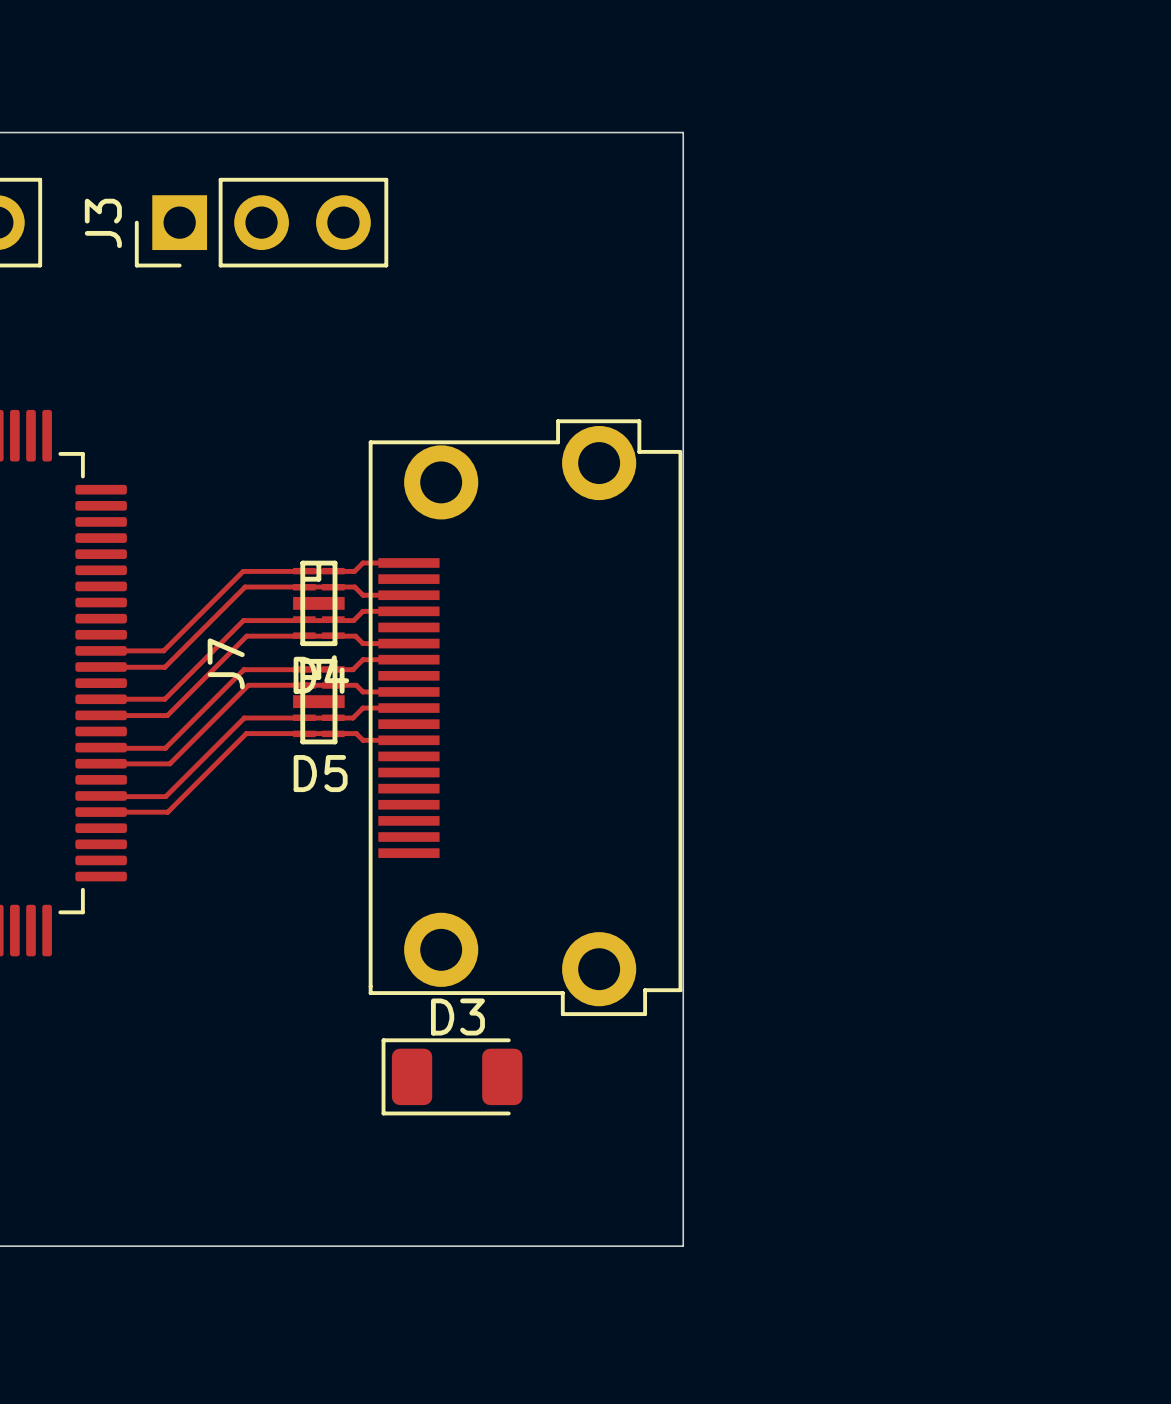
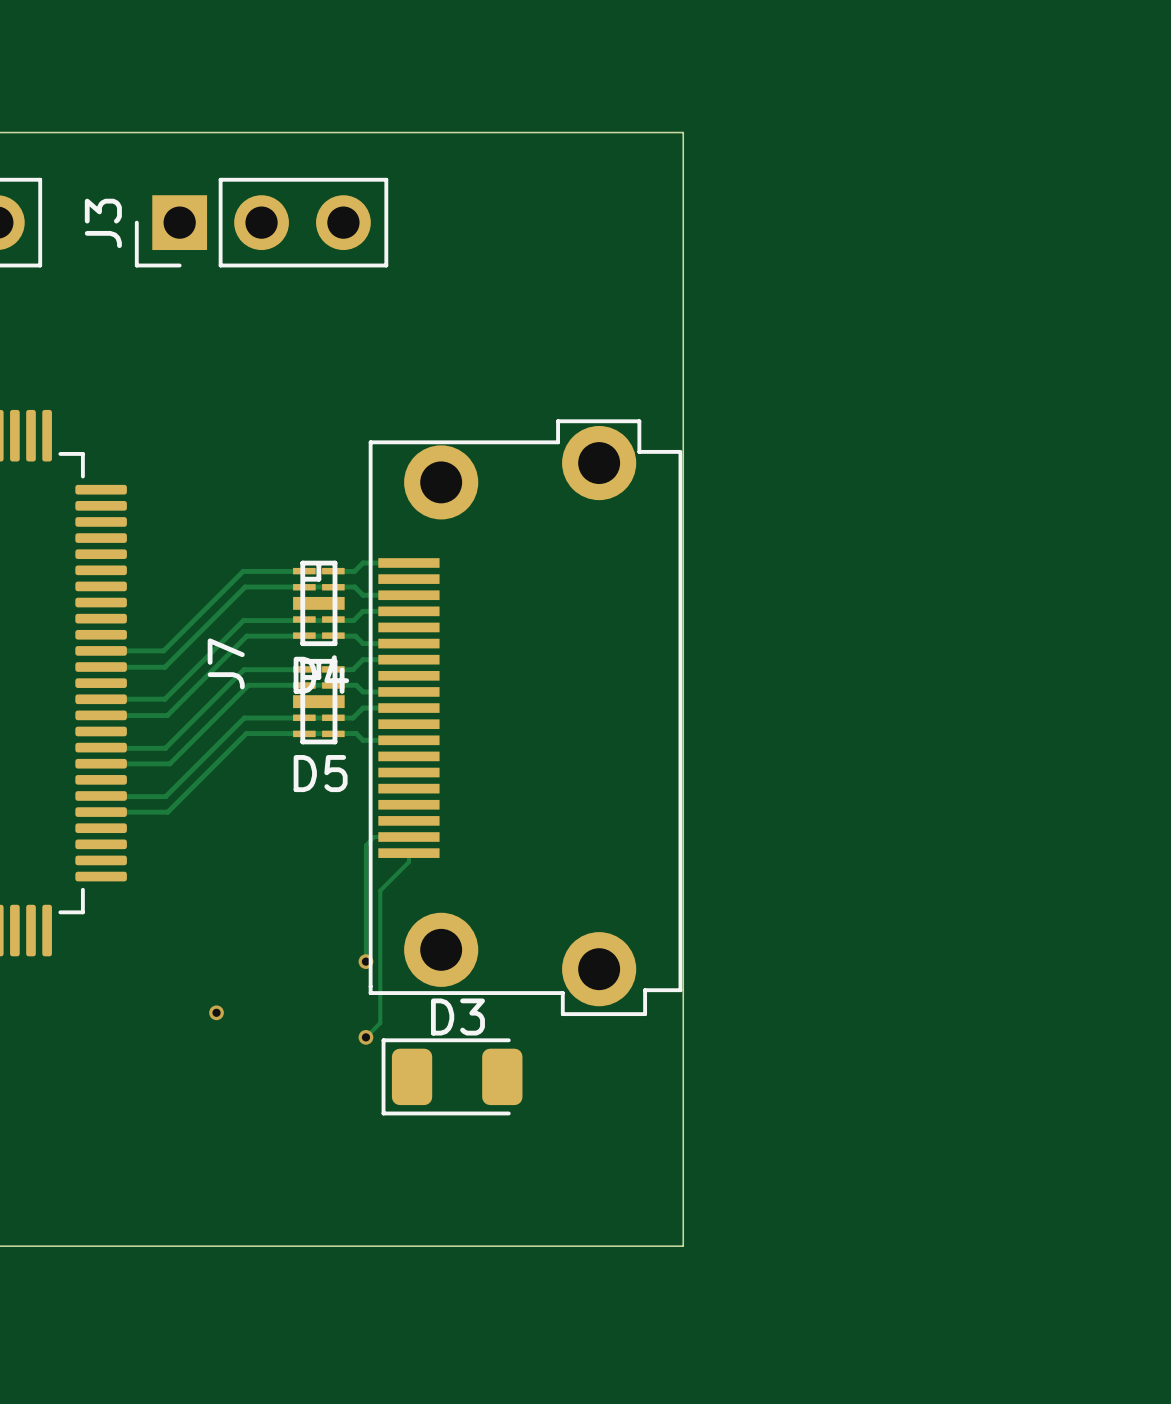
track: none -> (408, 837) (374, 837) (365, 845) (365, 961)
track: none -> (408, 853) (408, 862) (380, 890) (380, 1023) (365, 1037)
via: none -> (365, 961)
via: none -> (216, 1012)
via: none -> (365, 1037)

